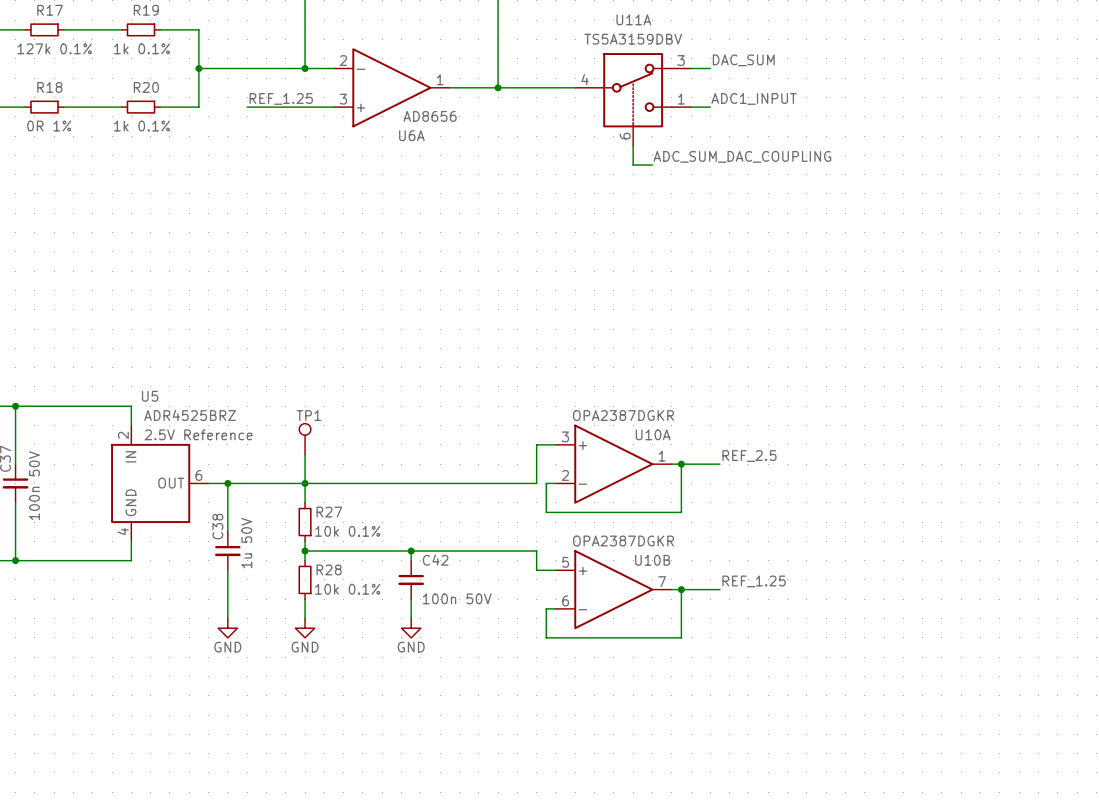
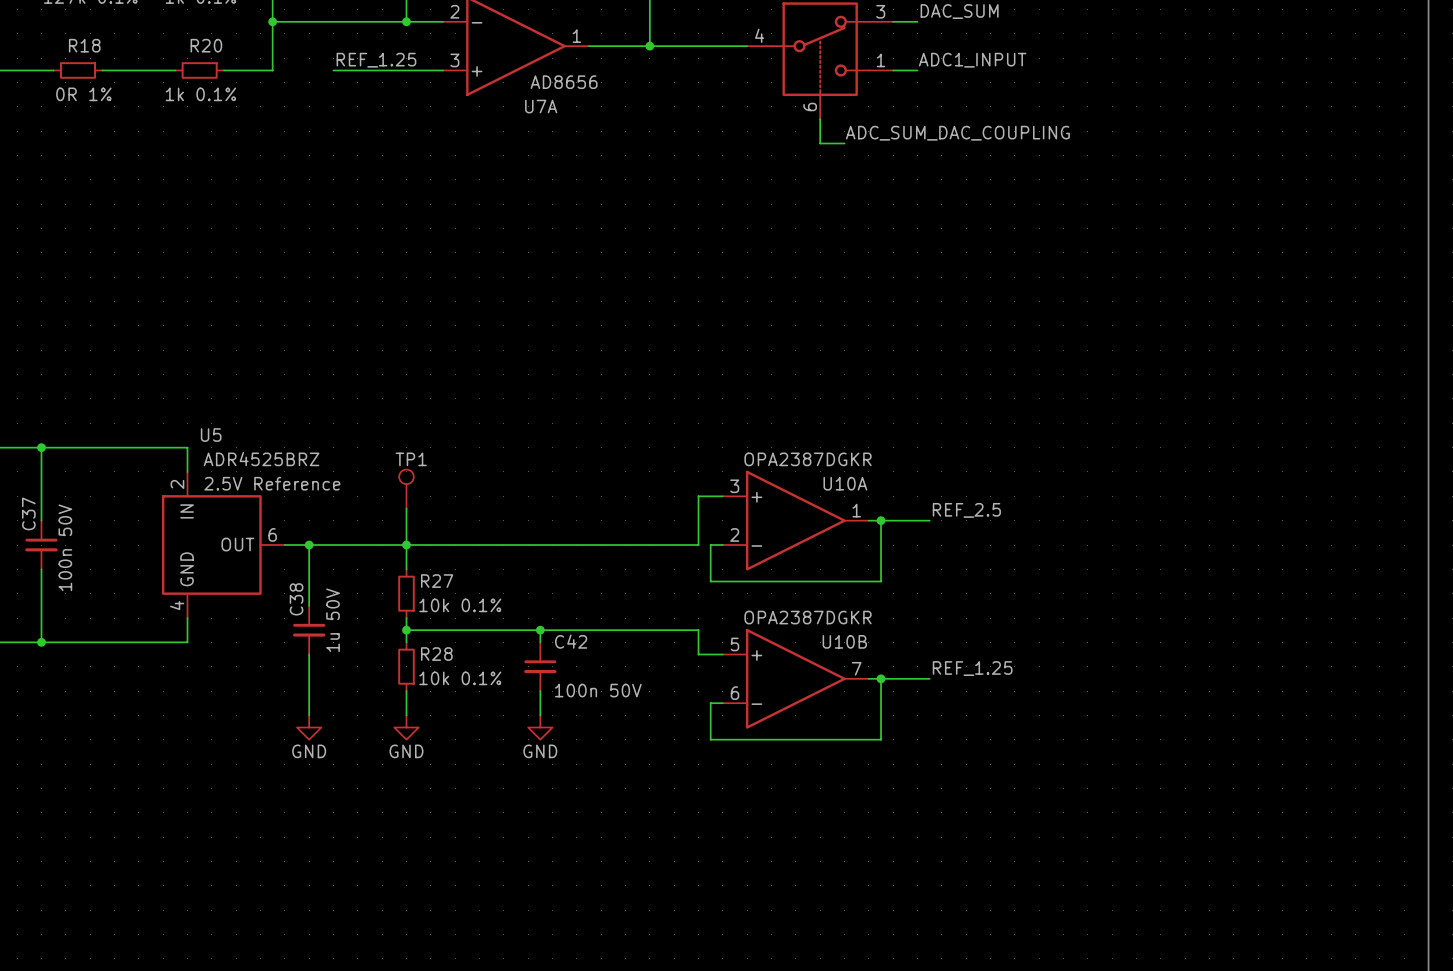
U6A name: U6A (411, 135) -> U7A (541, 106)

